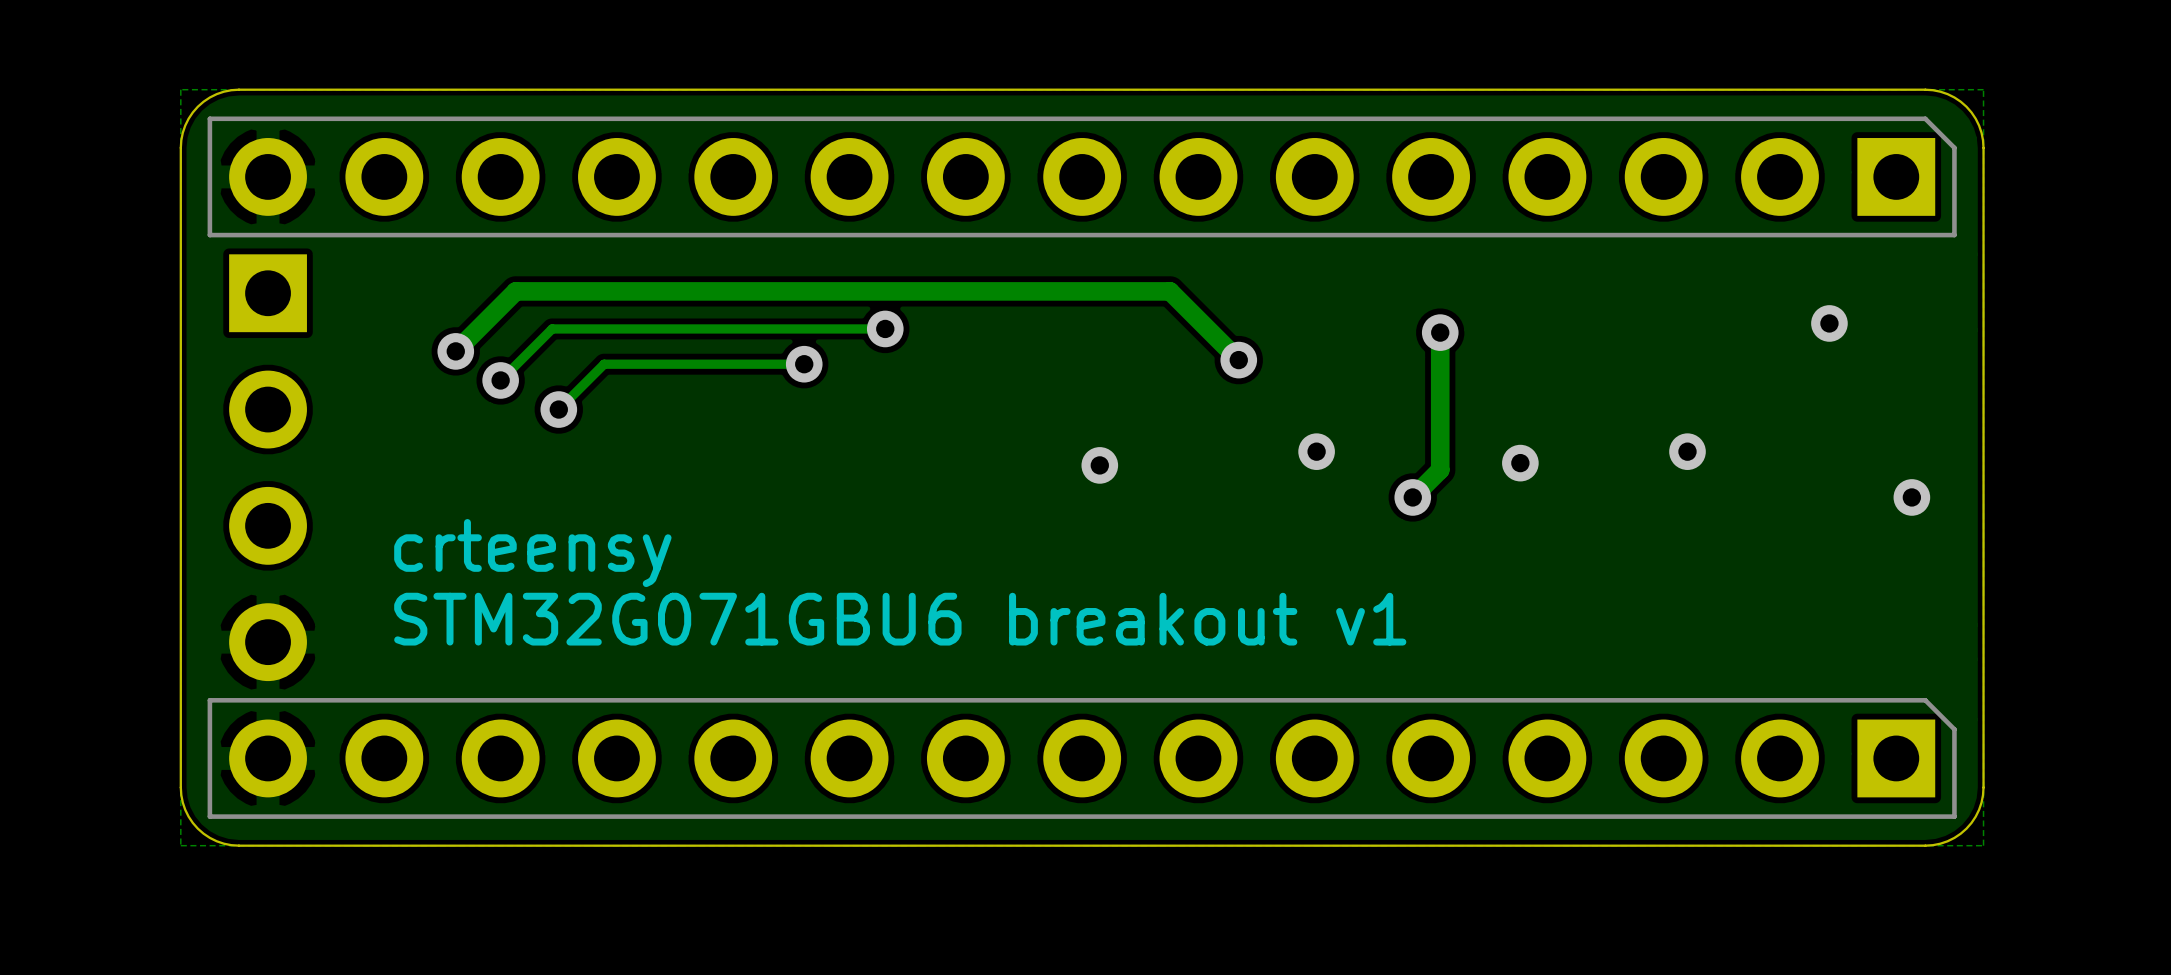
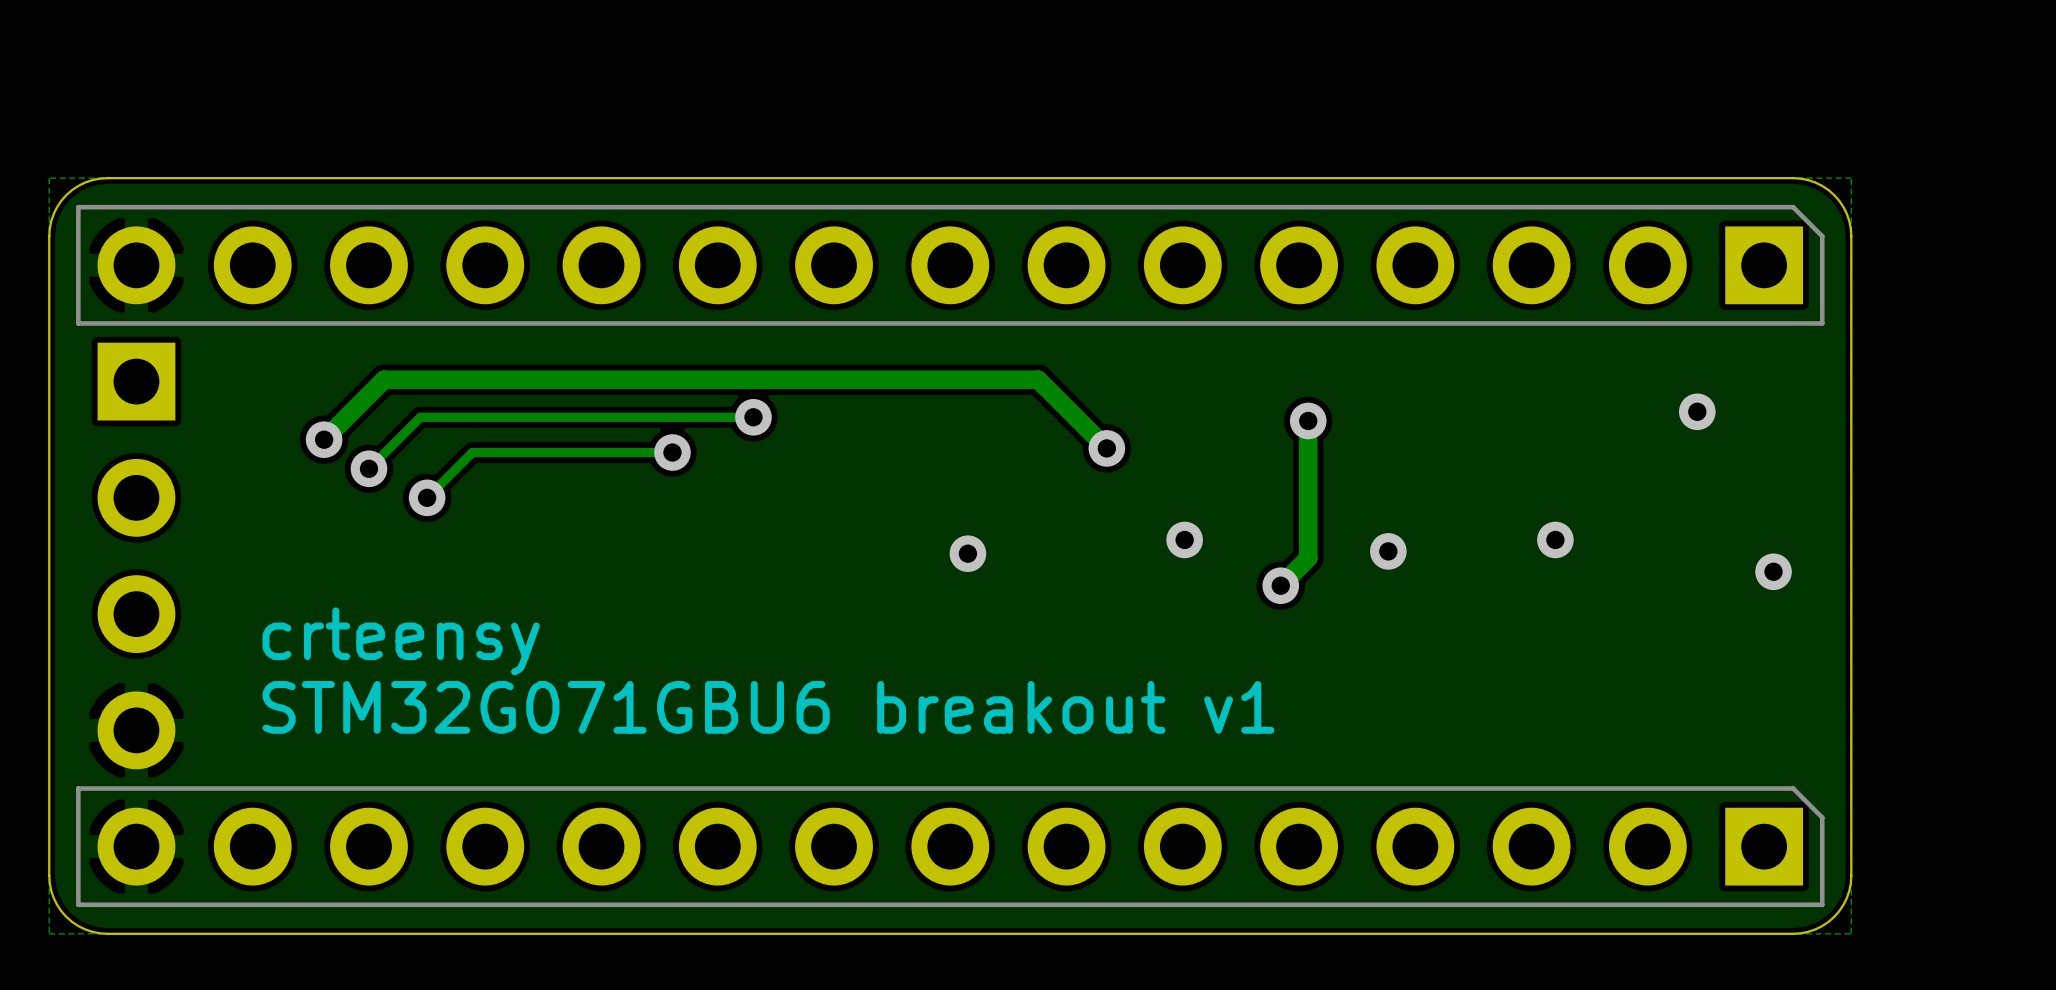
via position: (1911, 497) -> (1773, 571)

